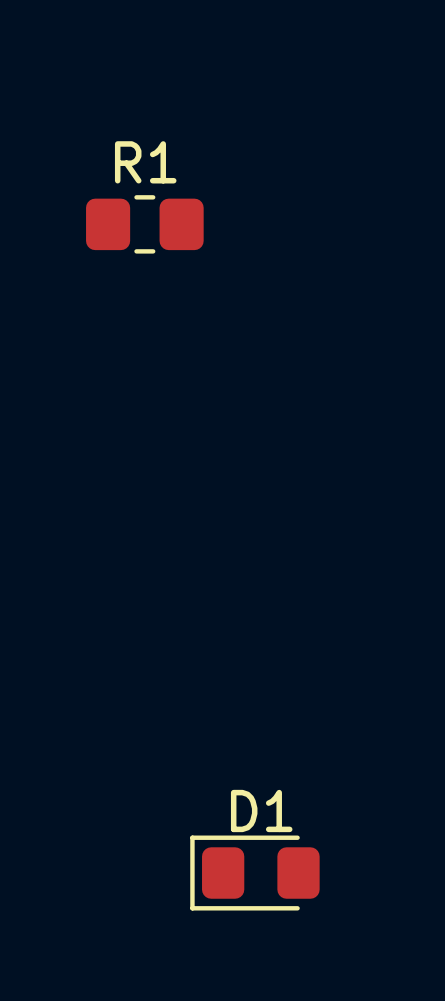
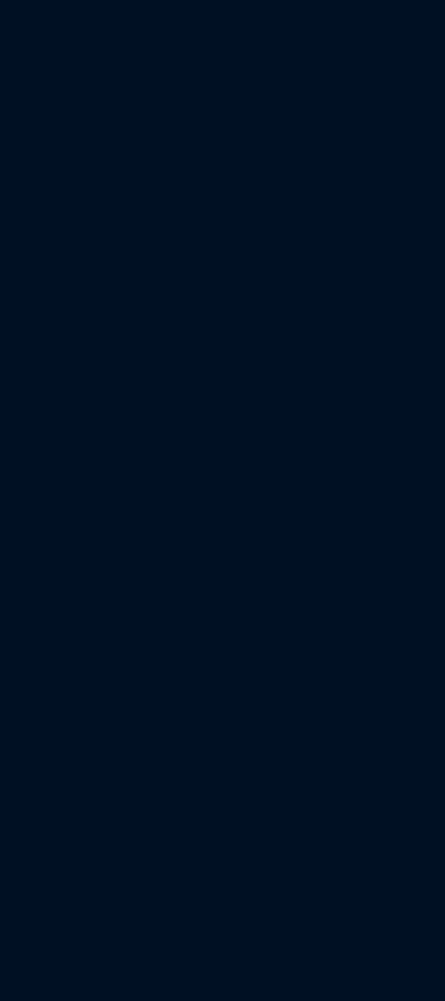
R1: (144, 224) -> none
D1: (254, 873) -> none

